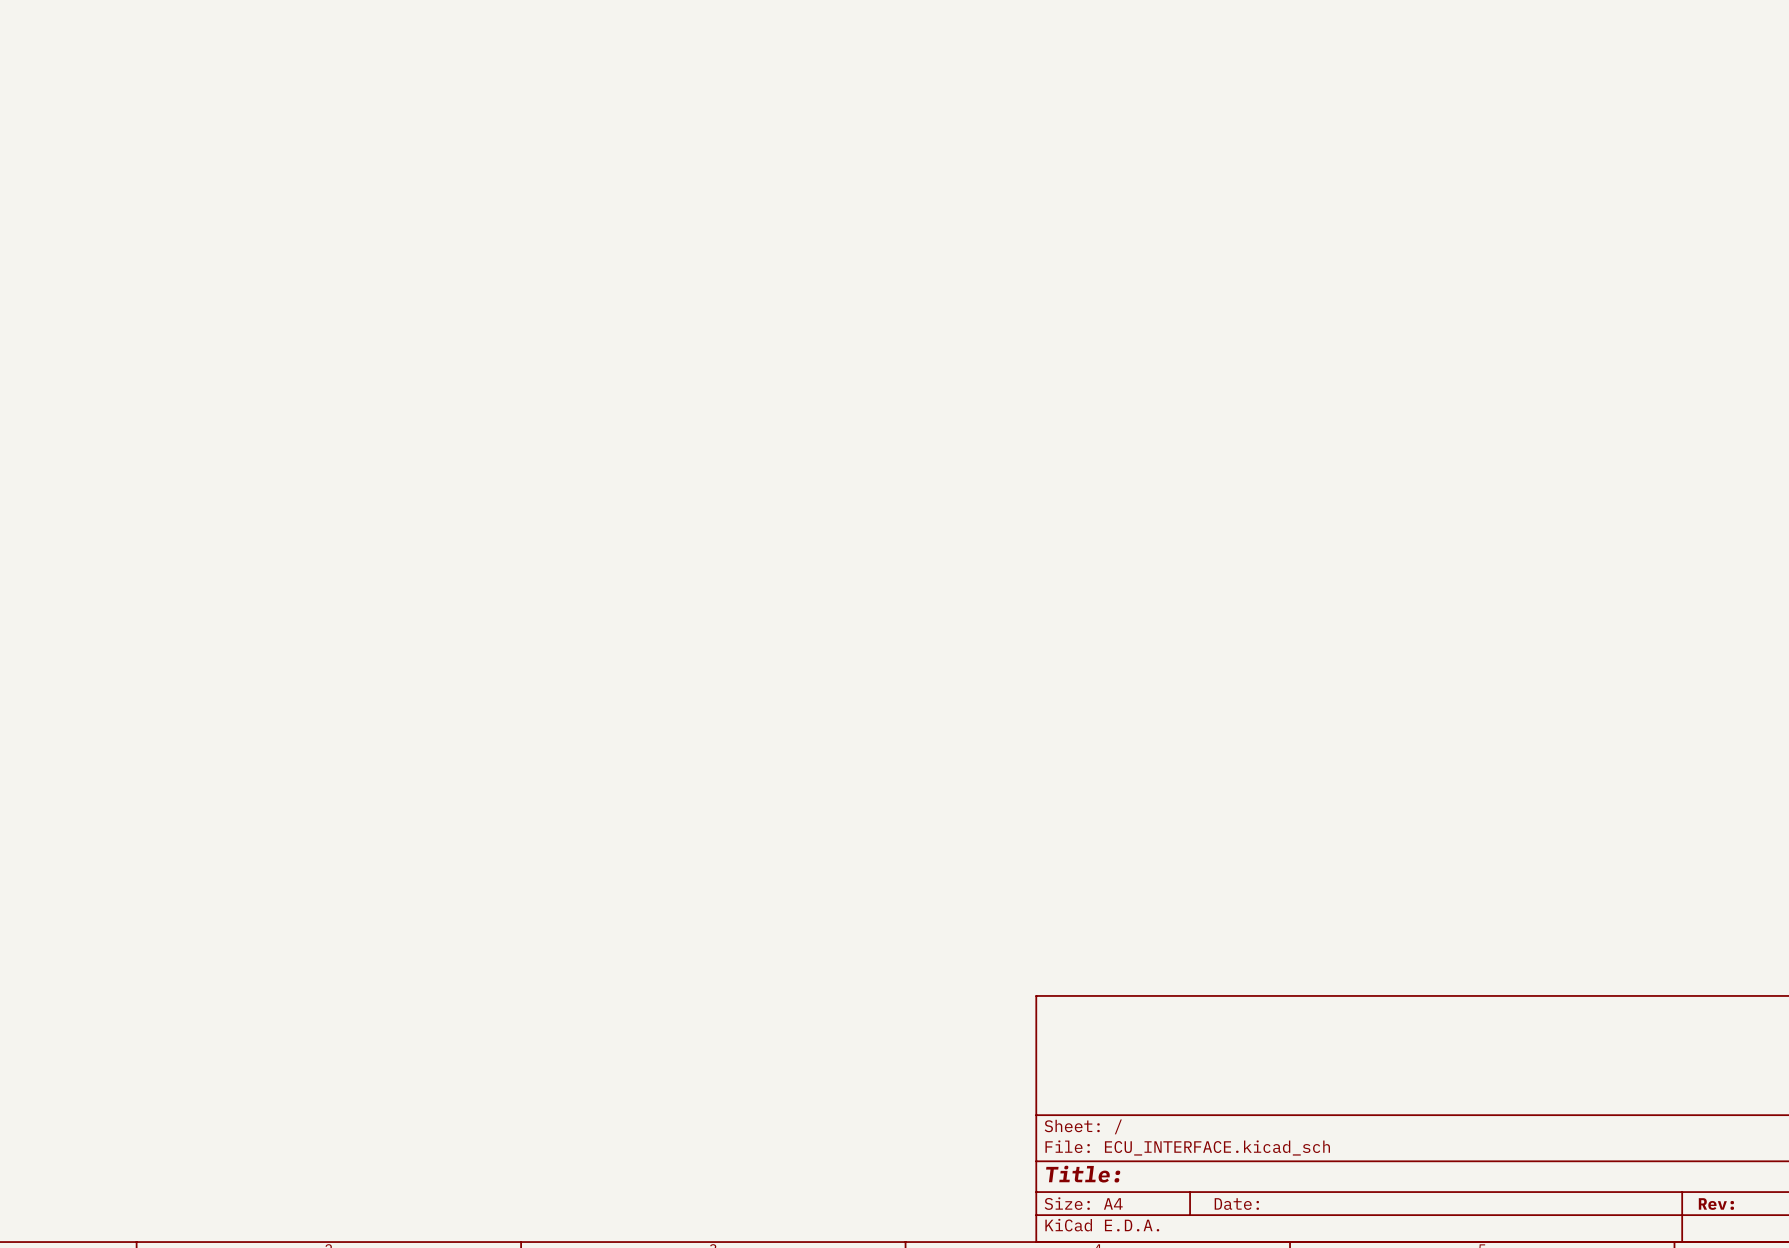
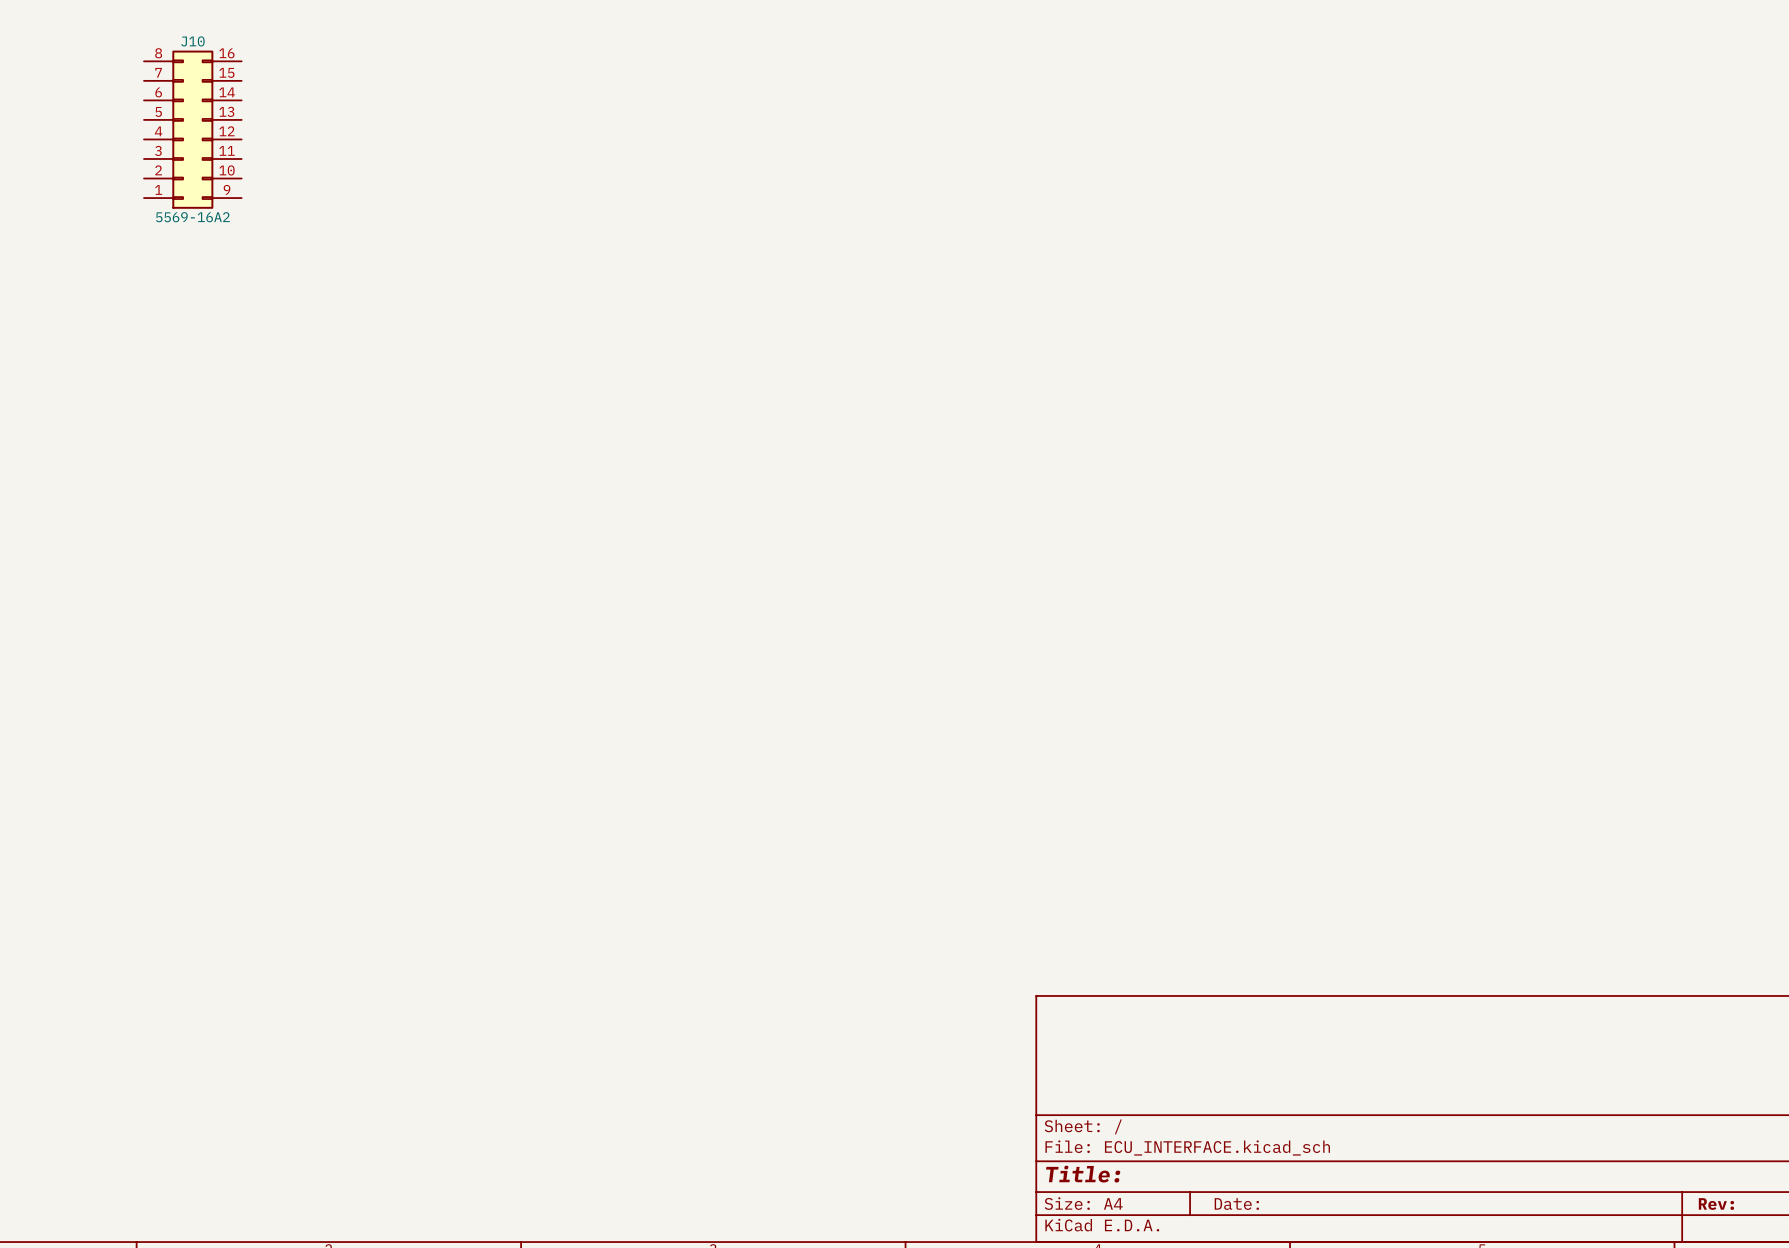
J10: none -> 5569-16A2 (192, 129)

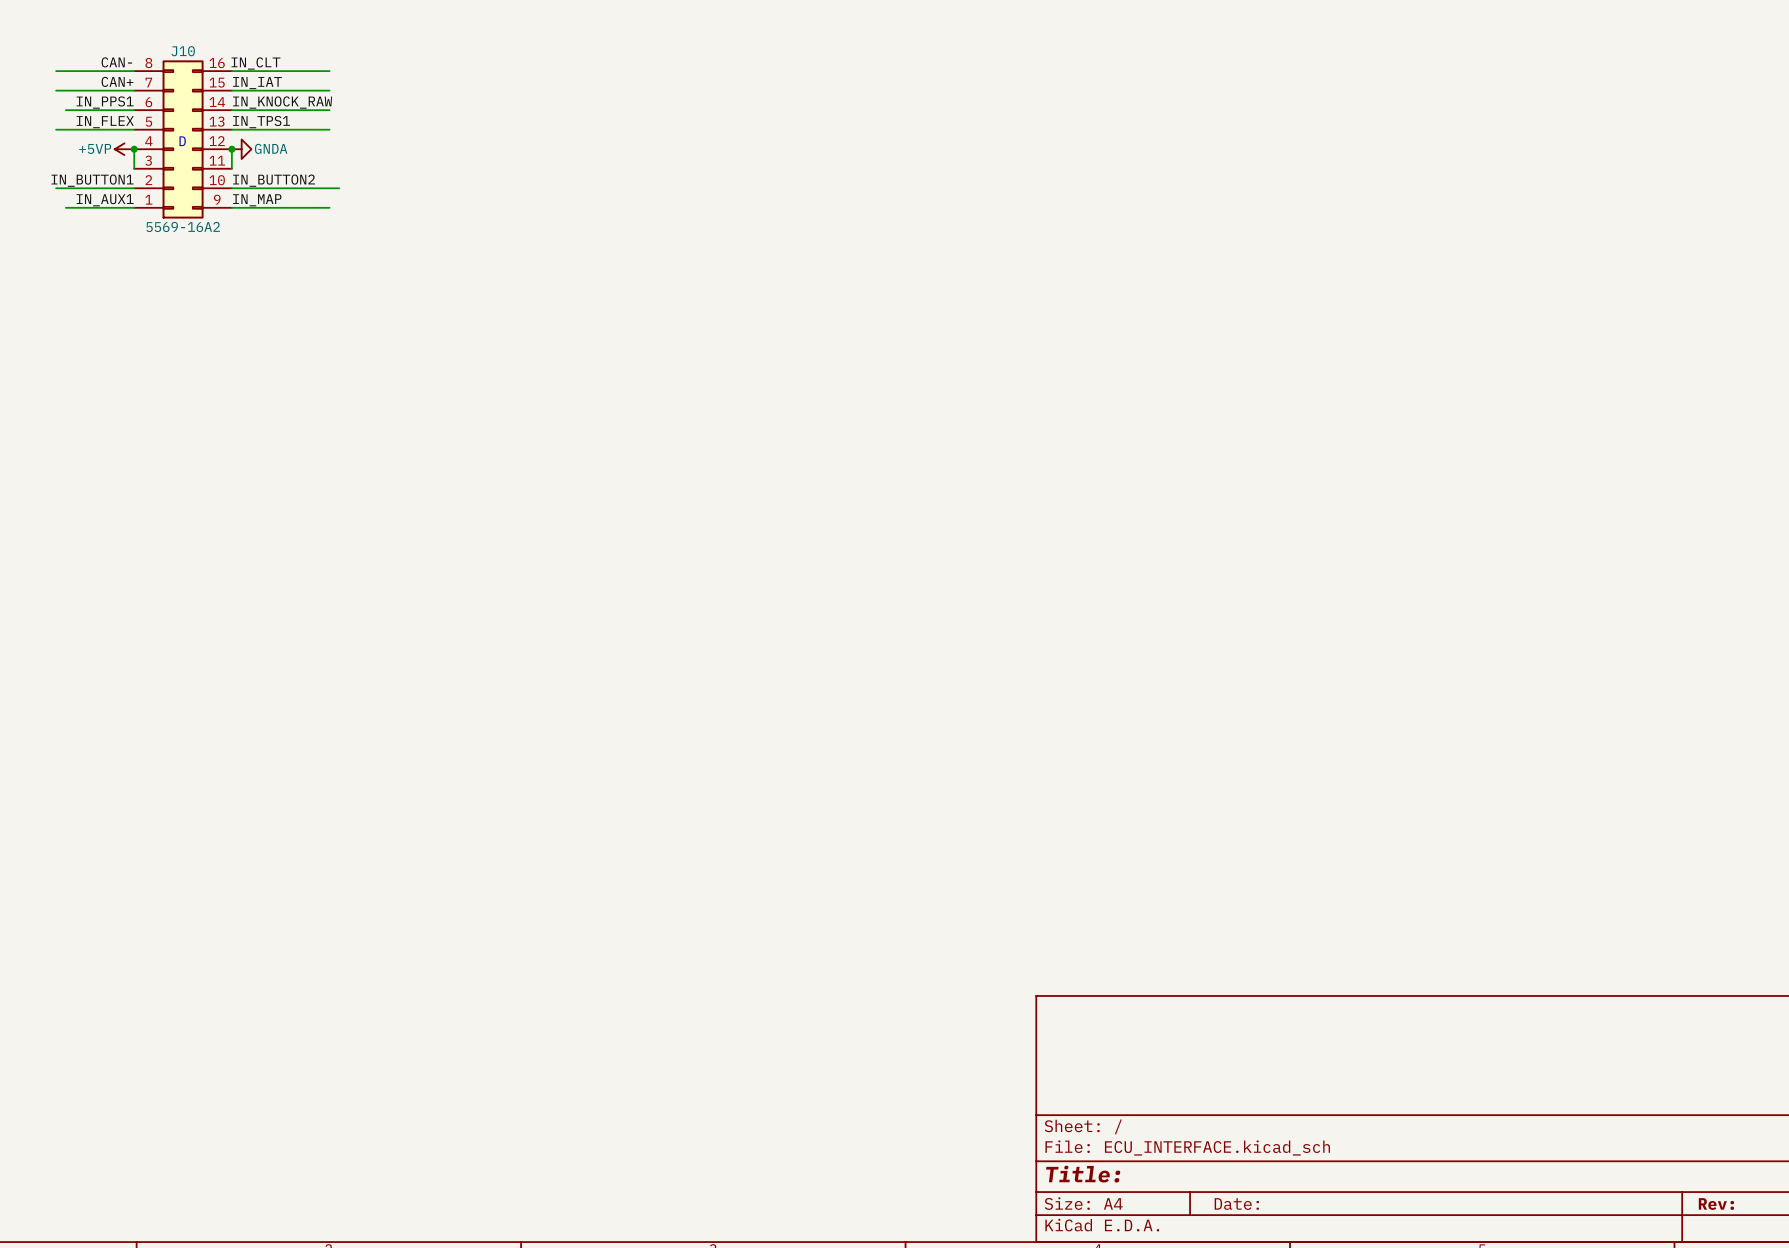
label: none -> CAN- (116, 62)
label: none -> IN_CLT (255, 63)
wire: none -> (56, 71) (134, 71)
wire: none -> (231, 71) (329, 71)
label: none -> CAN+ (117, 81)
label: none -> IN_IAT (257, 83)
wire: none -> (56, 90) (134, 90)
wire: none -> (231, 90) (329, 90)
label: none -> IN_PPS1 (105, 102)
label: none -> IN_KNOCK_RAW (282, 102)
wire: none -> (65, 110) (134, 110)
wire: none -> (231, 110) (329, 110)
label: none -> IN_FLEX (105, 122)
label: none -> IN_TPS1 (261, 122)
wire: none -> (56, 129) (134, 129)
J10 position: (192, 129) -> (183, 139)
wire: none -> (231, 129) (329, 129)
text: none -> D (182, 141)
power symbol: none -> +5VP (124, 149)
wire: none -> (134, 149) (134, 168)
junction: none -> (134, 149)
wire: none -> (231, 149) (231, 168)
junction: none -> (231, 149)
power symbol: none -> GNDA (241, 149)
label: none -> IN_BUTTON1 (92, 180)
label: none -> IN_BUTTON2 (274, 180)
wire: none -> (56, 188) (134, 188)
wire: none -> (231, 188) (339, 188)
label: none -> IN_AUX1 (105, 200)
label: none -> IN_MAP (257, 200)
wire: none -> (65, 207) (134, 207)
wire: none -> (231, 207) (329, 207)

